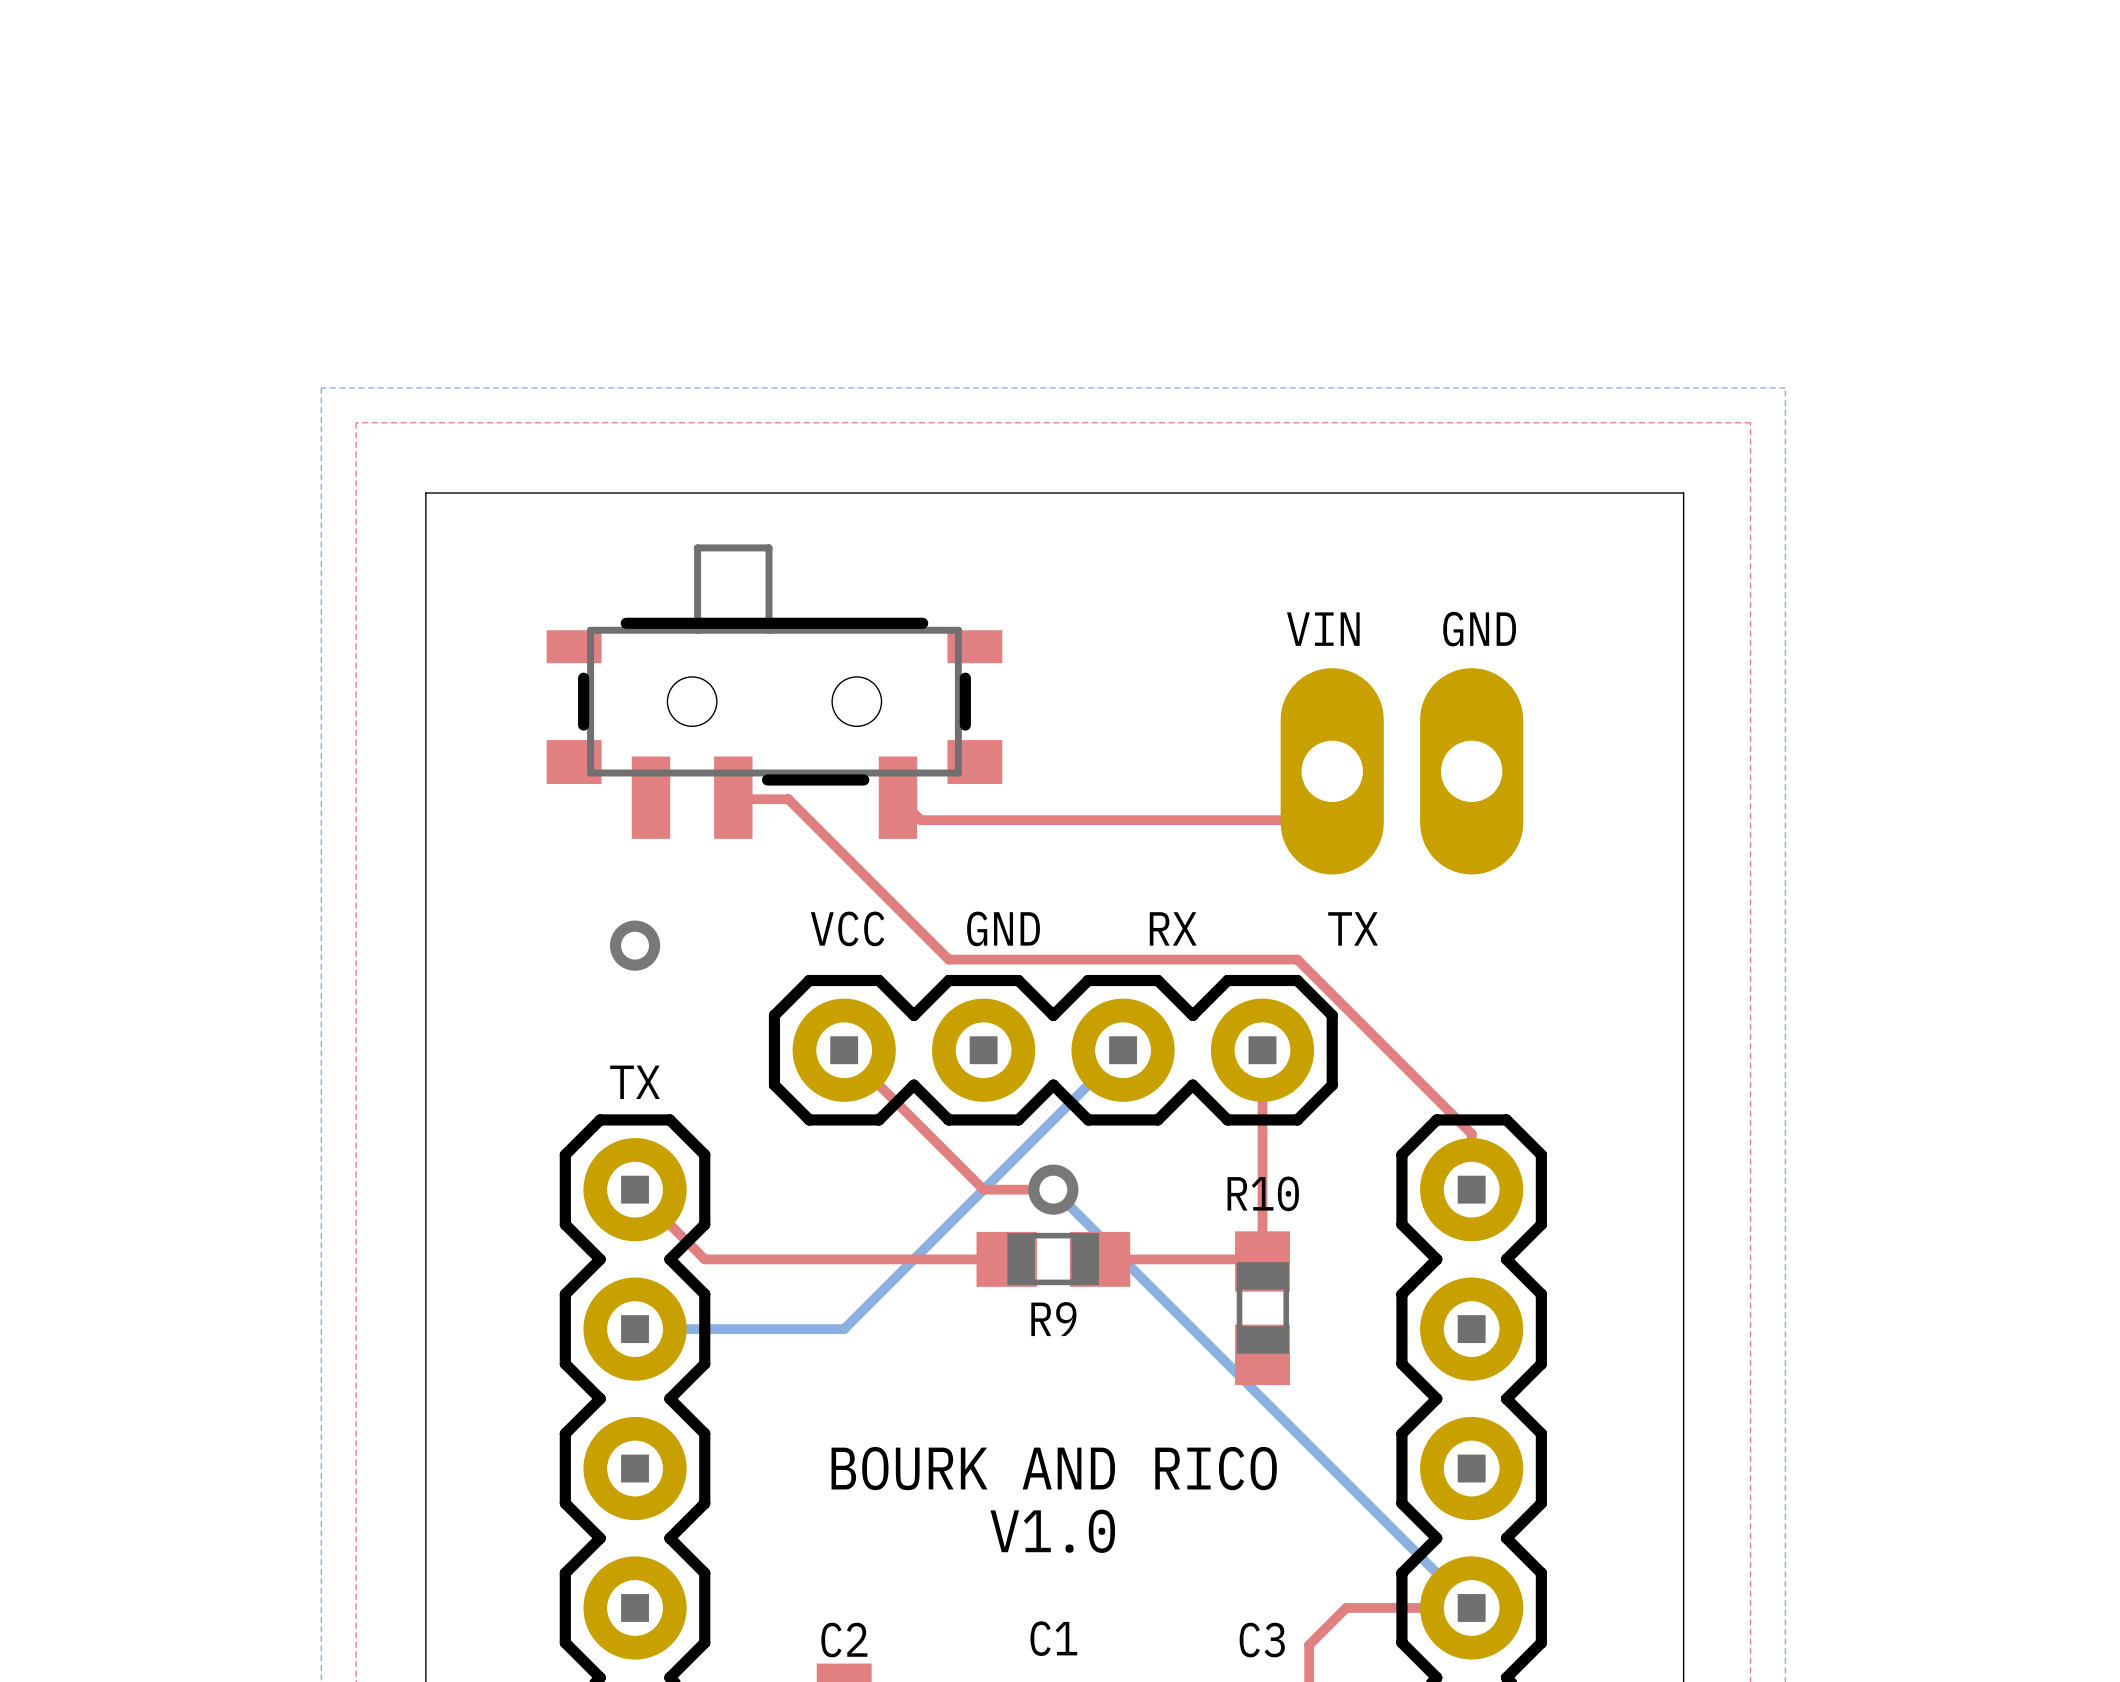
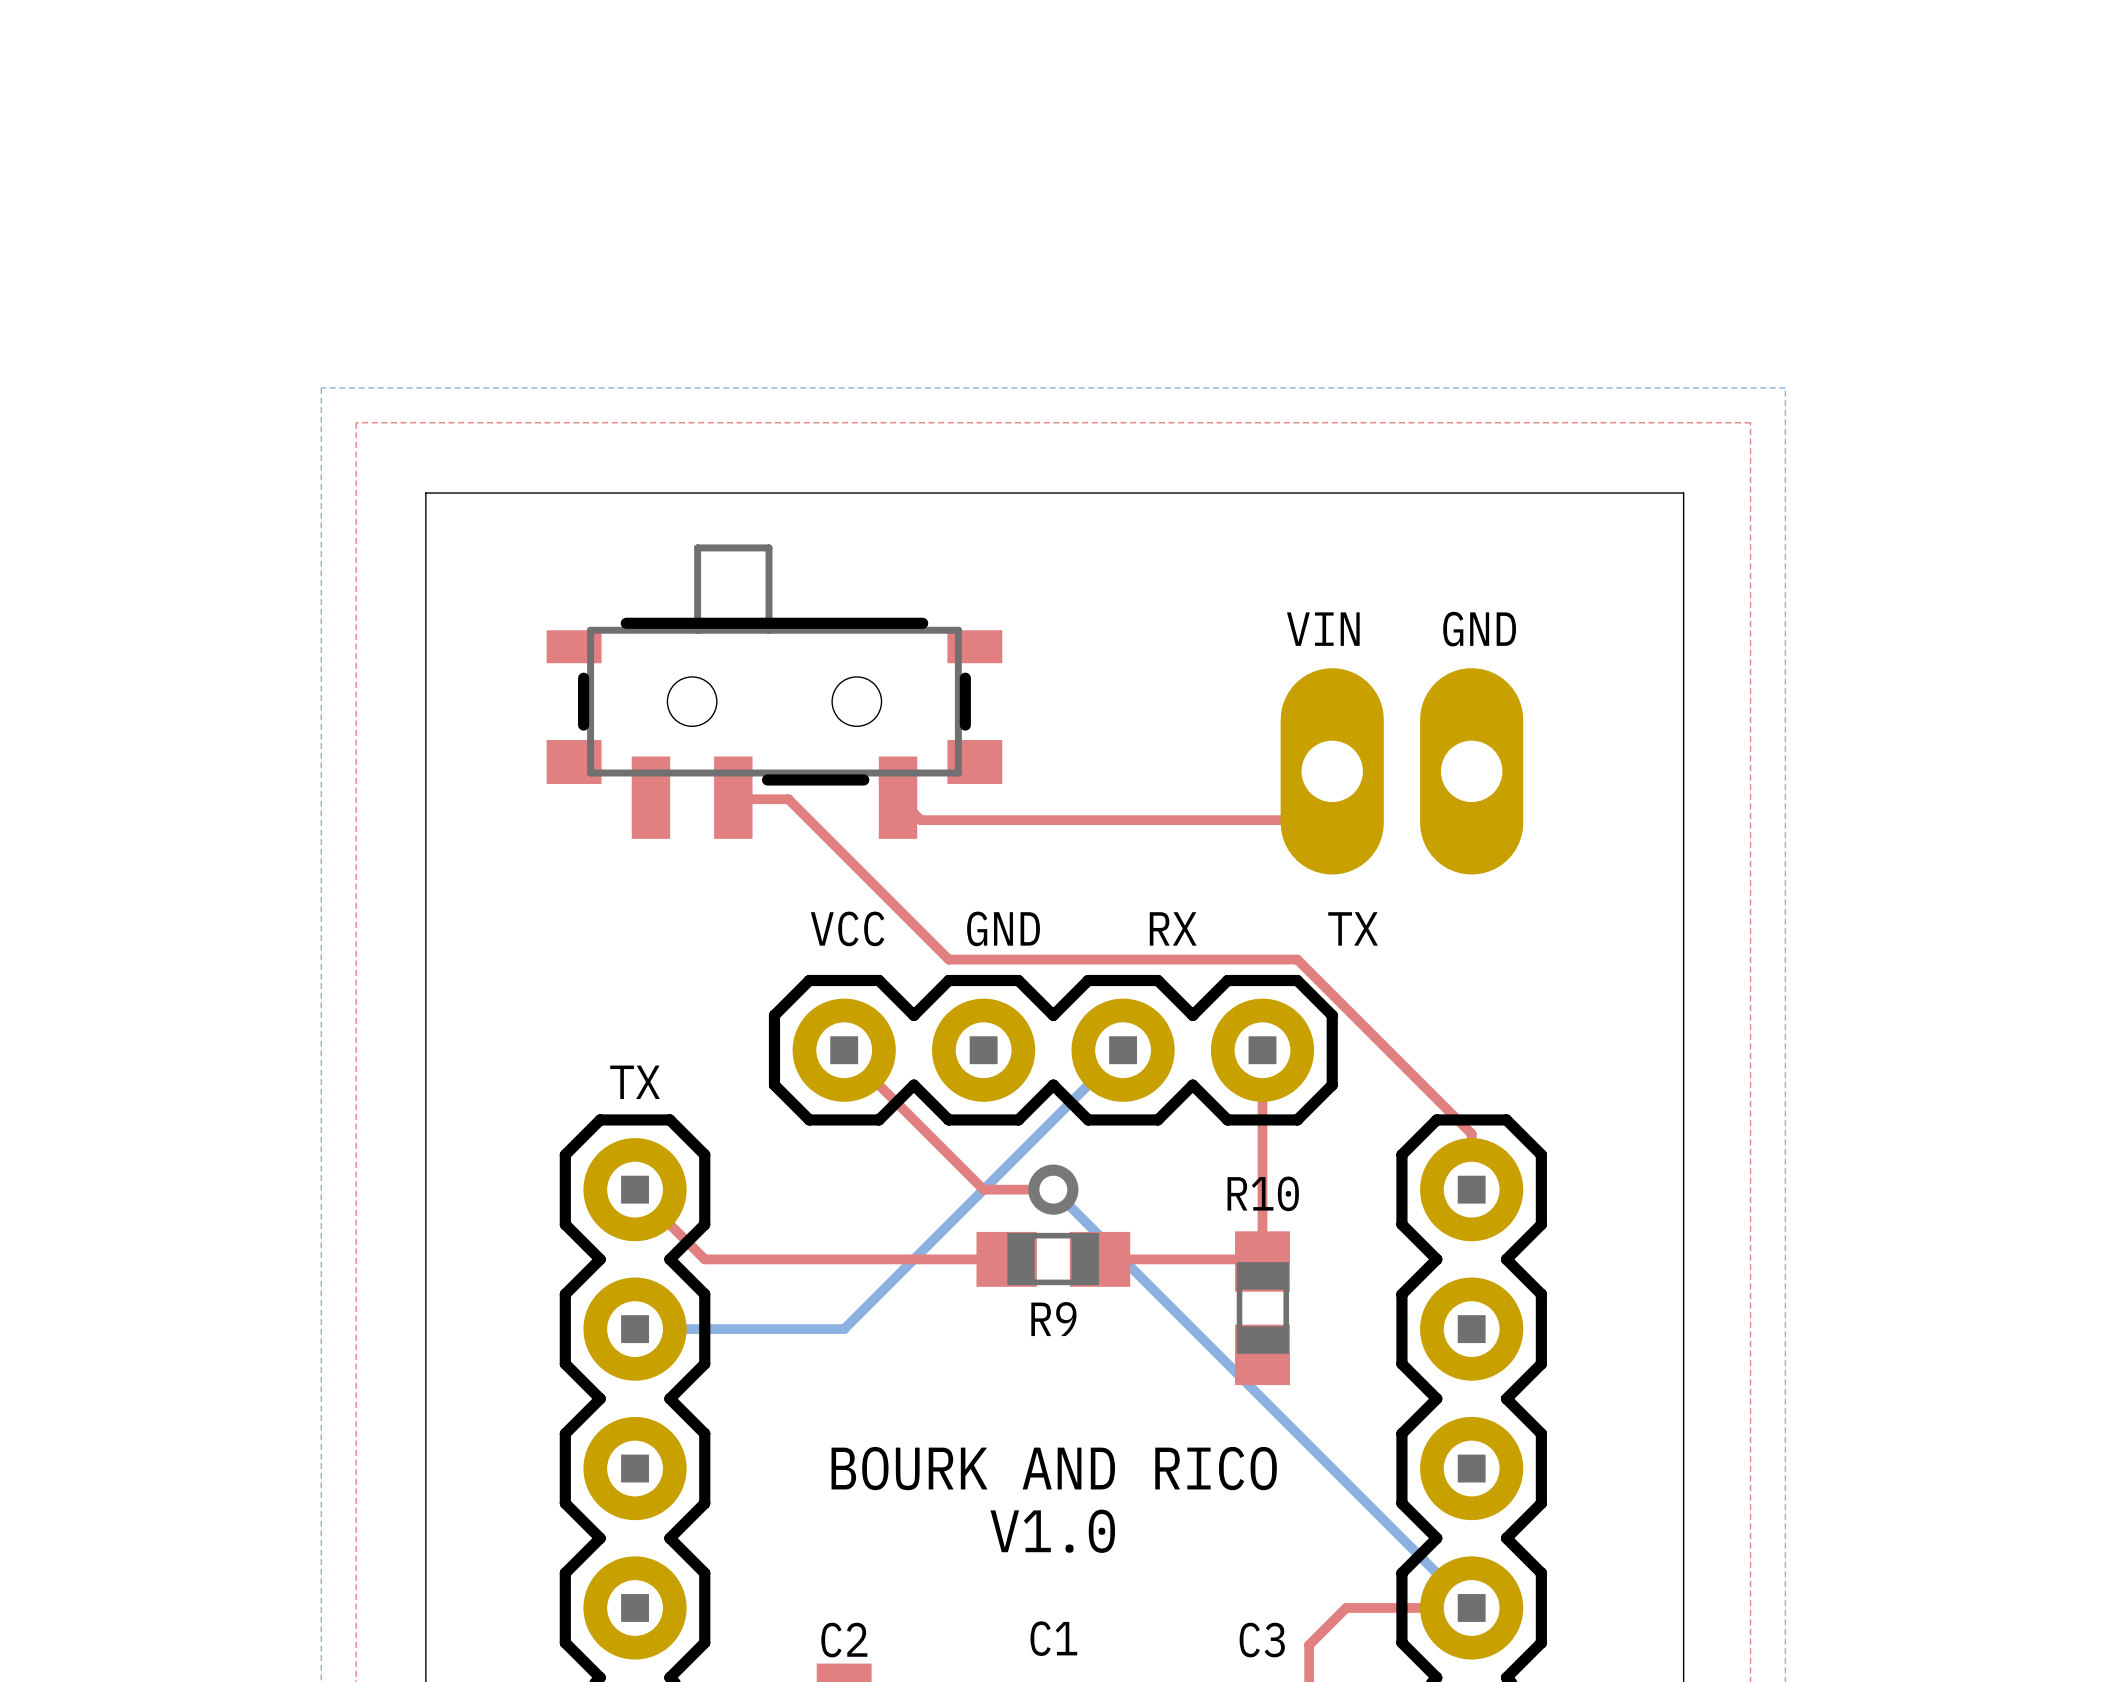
via: (635, 945) -> none

